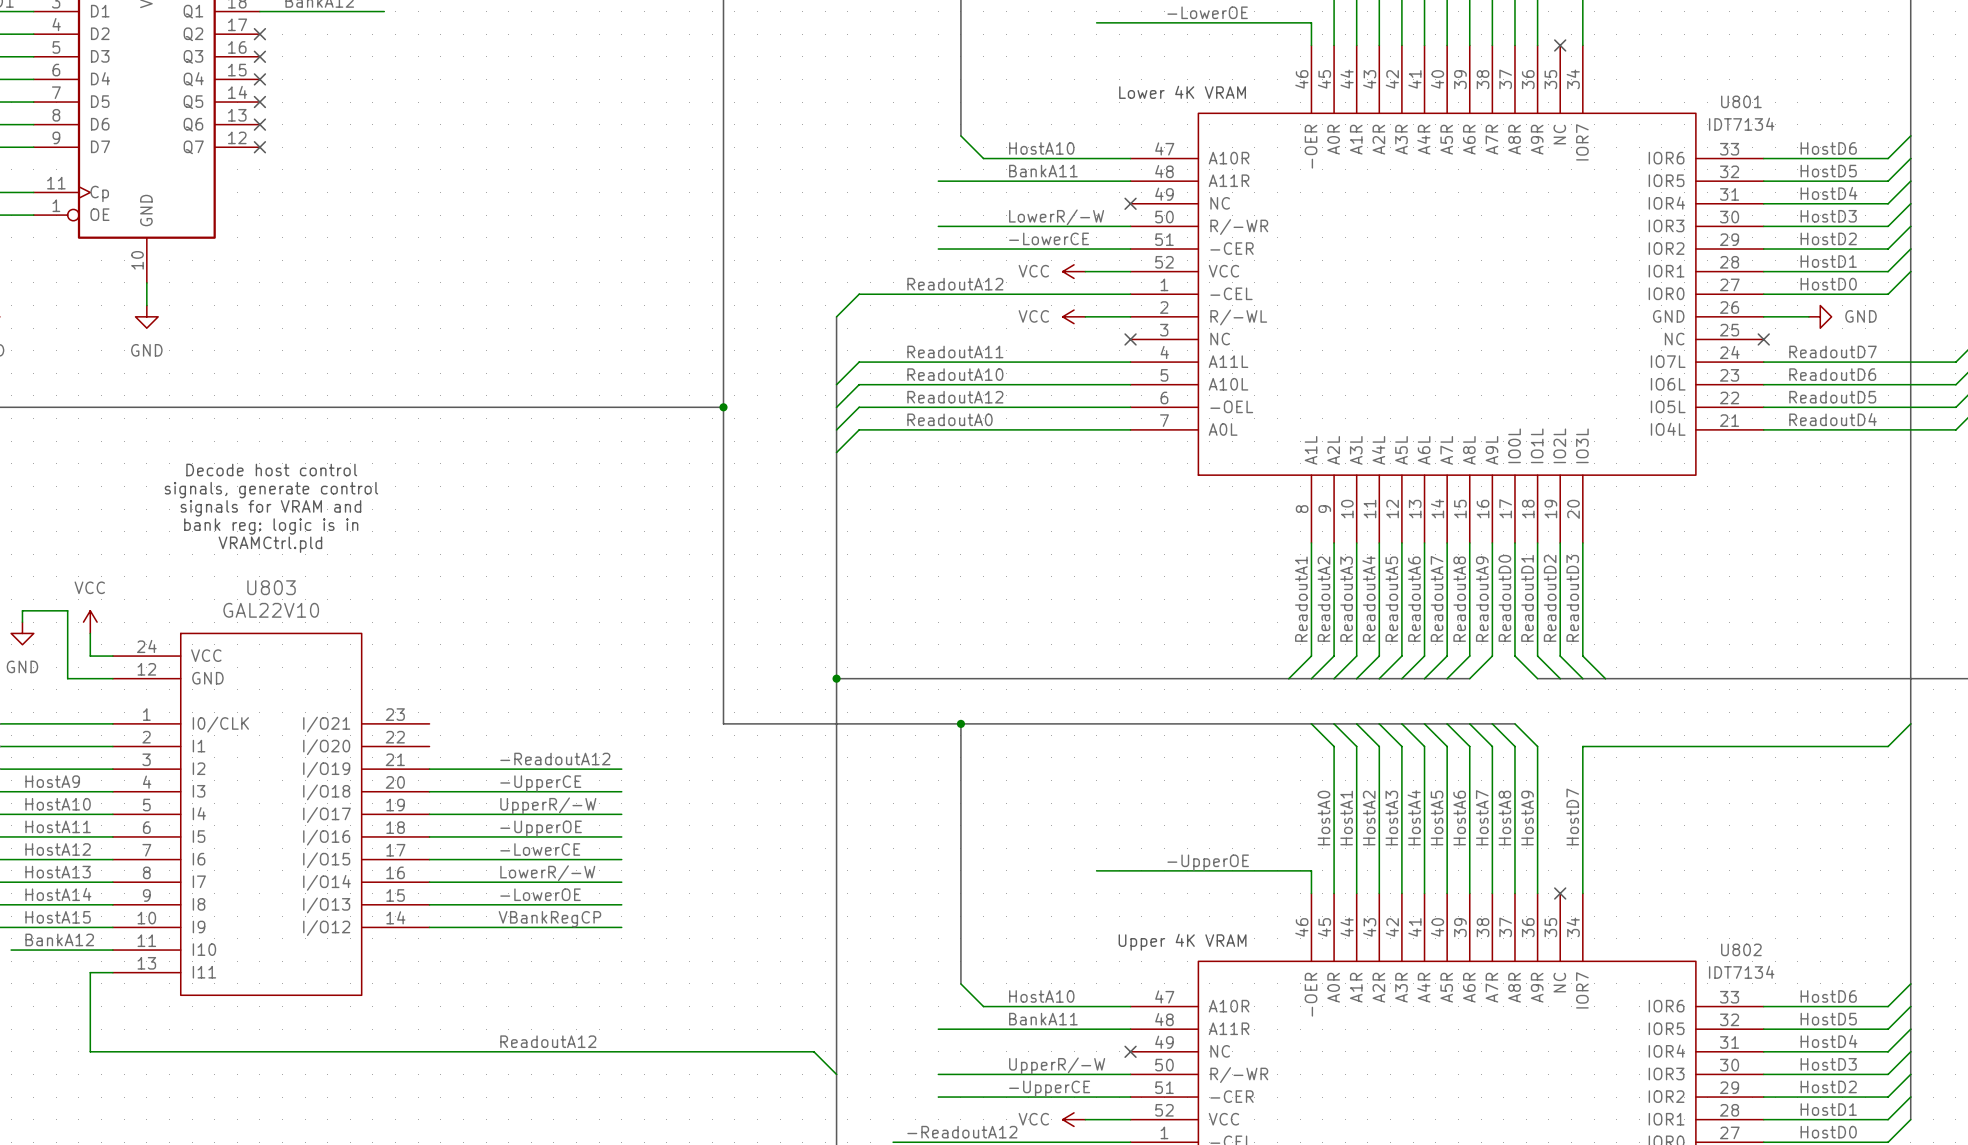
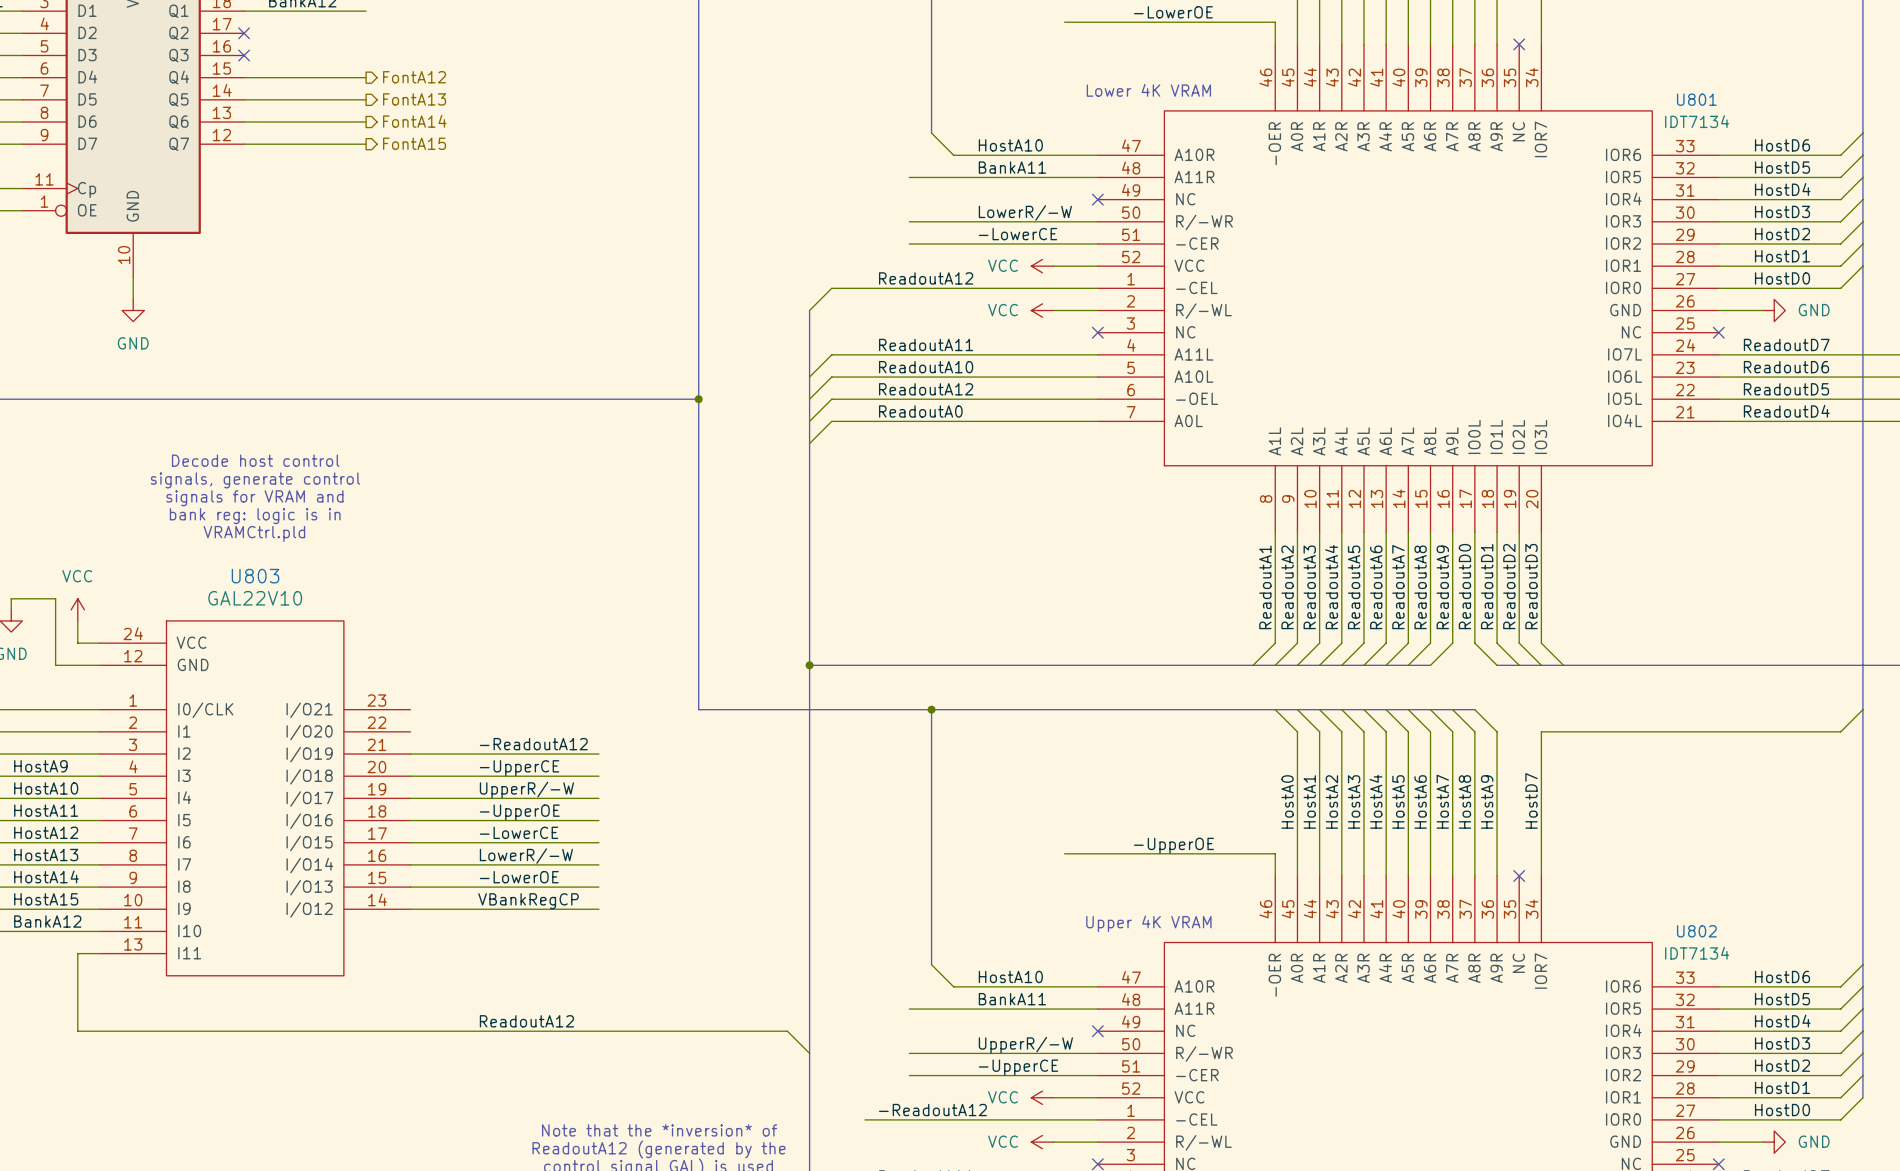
hierarchical label: none -> FontA12 (414, 77)
wire: none -> (244, 77) (366, 77)
no-connect mark: (259, 79) -> none
hierarchical label: none -> FontA13 (414, 99)
wire: none -> (244, 99) (366, 99)
no-connect mark: (259, 102) -> none
hierarchical label: none -> FontA14 (414, 121)
wire: none -> (244, 122) (366, 122)
no-connect mark: (259, 124) -> none
hierarchical label: none -> FontA15 (414, 143)
wire: none -> (244, 144) (366, 144)
no-connect mark: (259, 147) -> none

